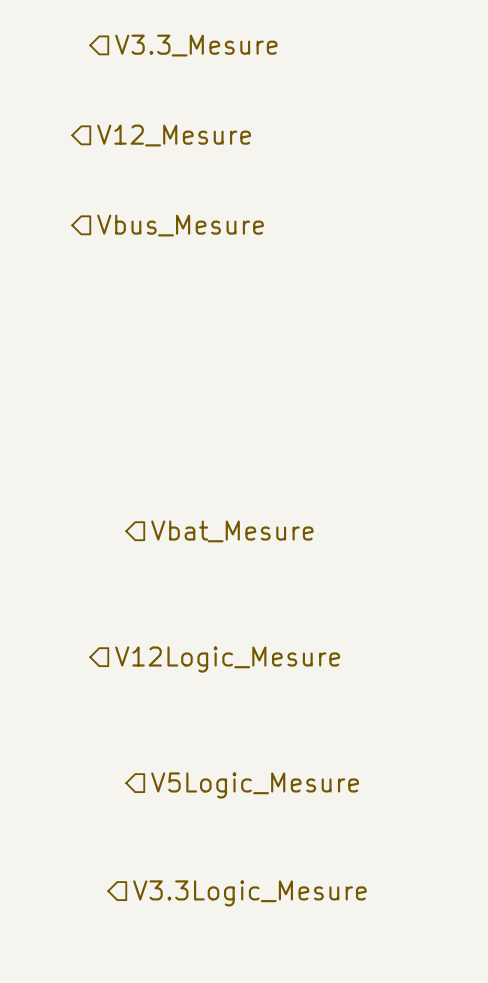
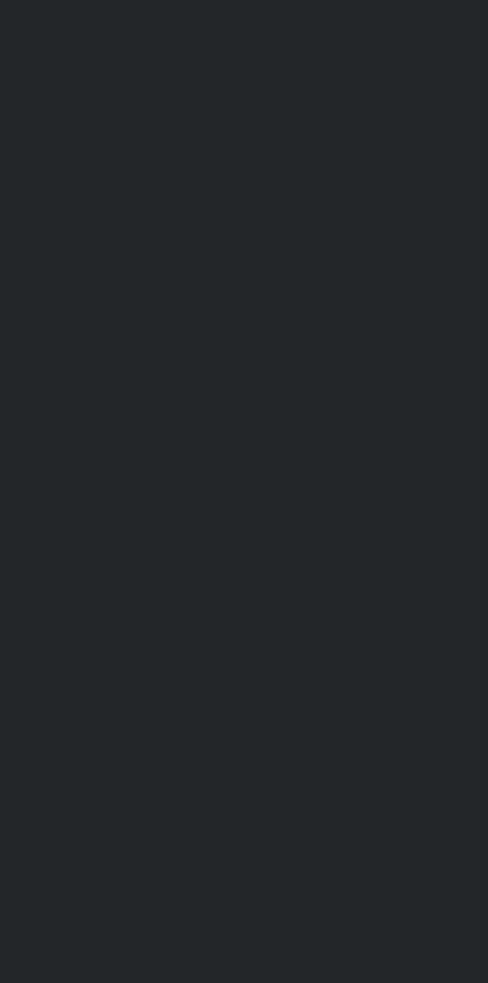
hierarchical label: V3.3_Mesure (196, 45) -> none
hierarchical label: V12_Mesure (174, 135) -> none
hierarchical label: Vbus_Mesure (180, 225) -> none
hierarchical label: Vbat_Mesure (232, 531) -> none
hierarchical label: V12Logic_Mesure (227, 659) -> none
hierarchical label: V5Logic_Mesure (255, 785) -> none
hierarchical label: V3.3Logic_Mesure (249, 893) -> none

